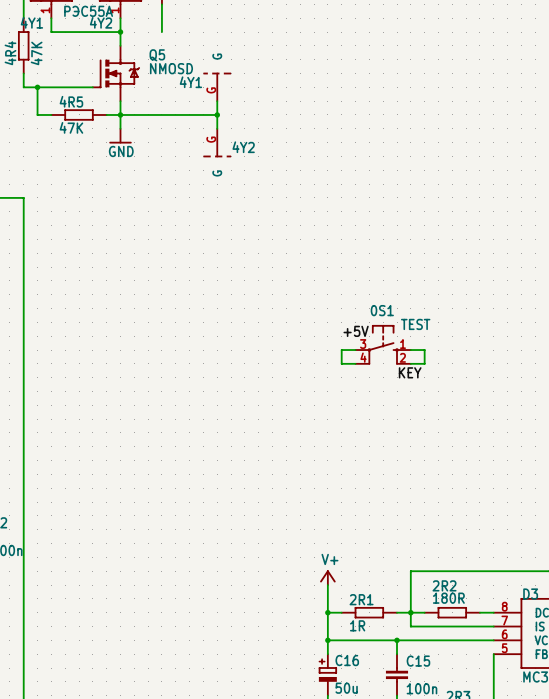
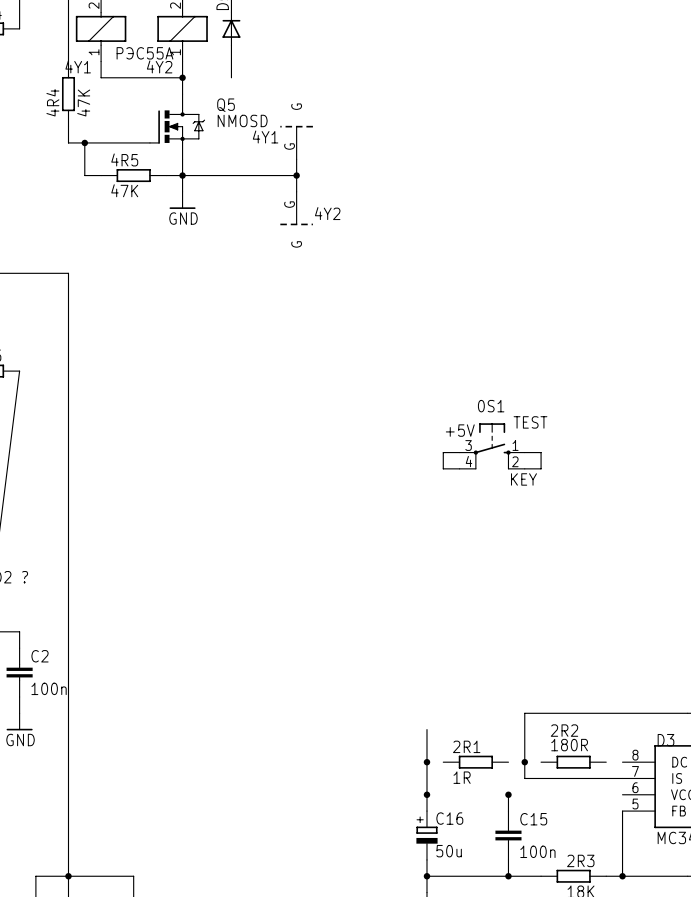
power symbol: V+ (327, 577) -> none
wire: (327, 612) (341, 612) -> none
wire: (397, 612) (424, 612) -> none
wire: (479, 612) (493, 612) -> none
wire: (327, 640) (493, 640) -> none

